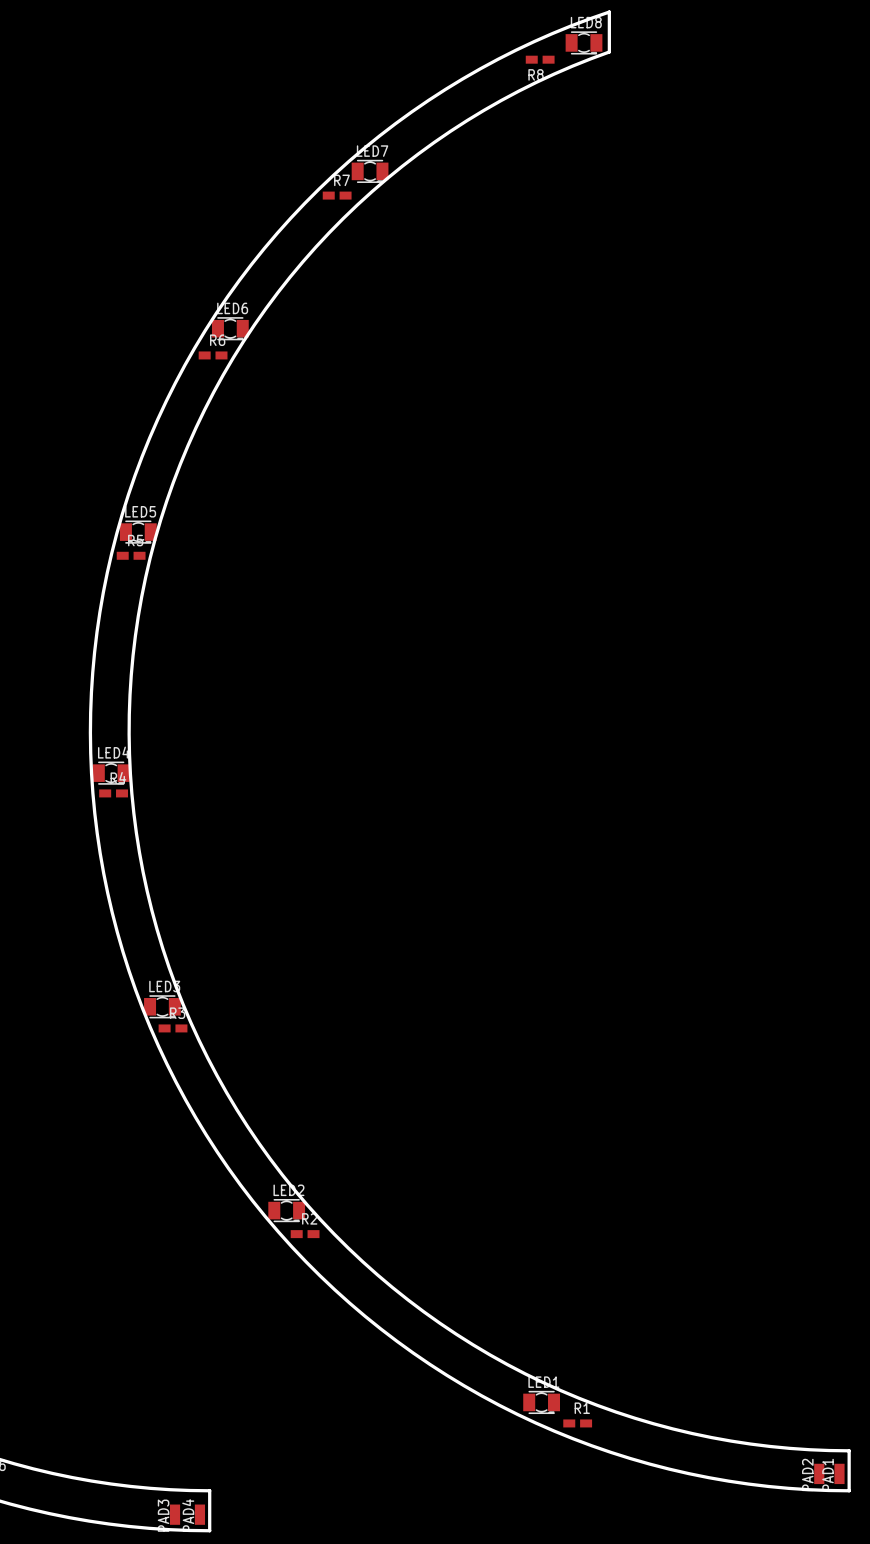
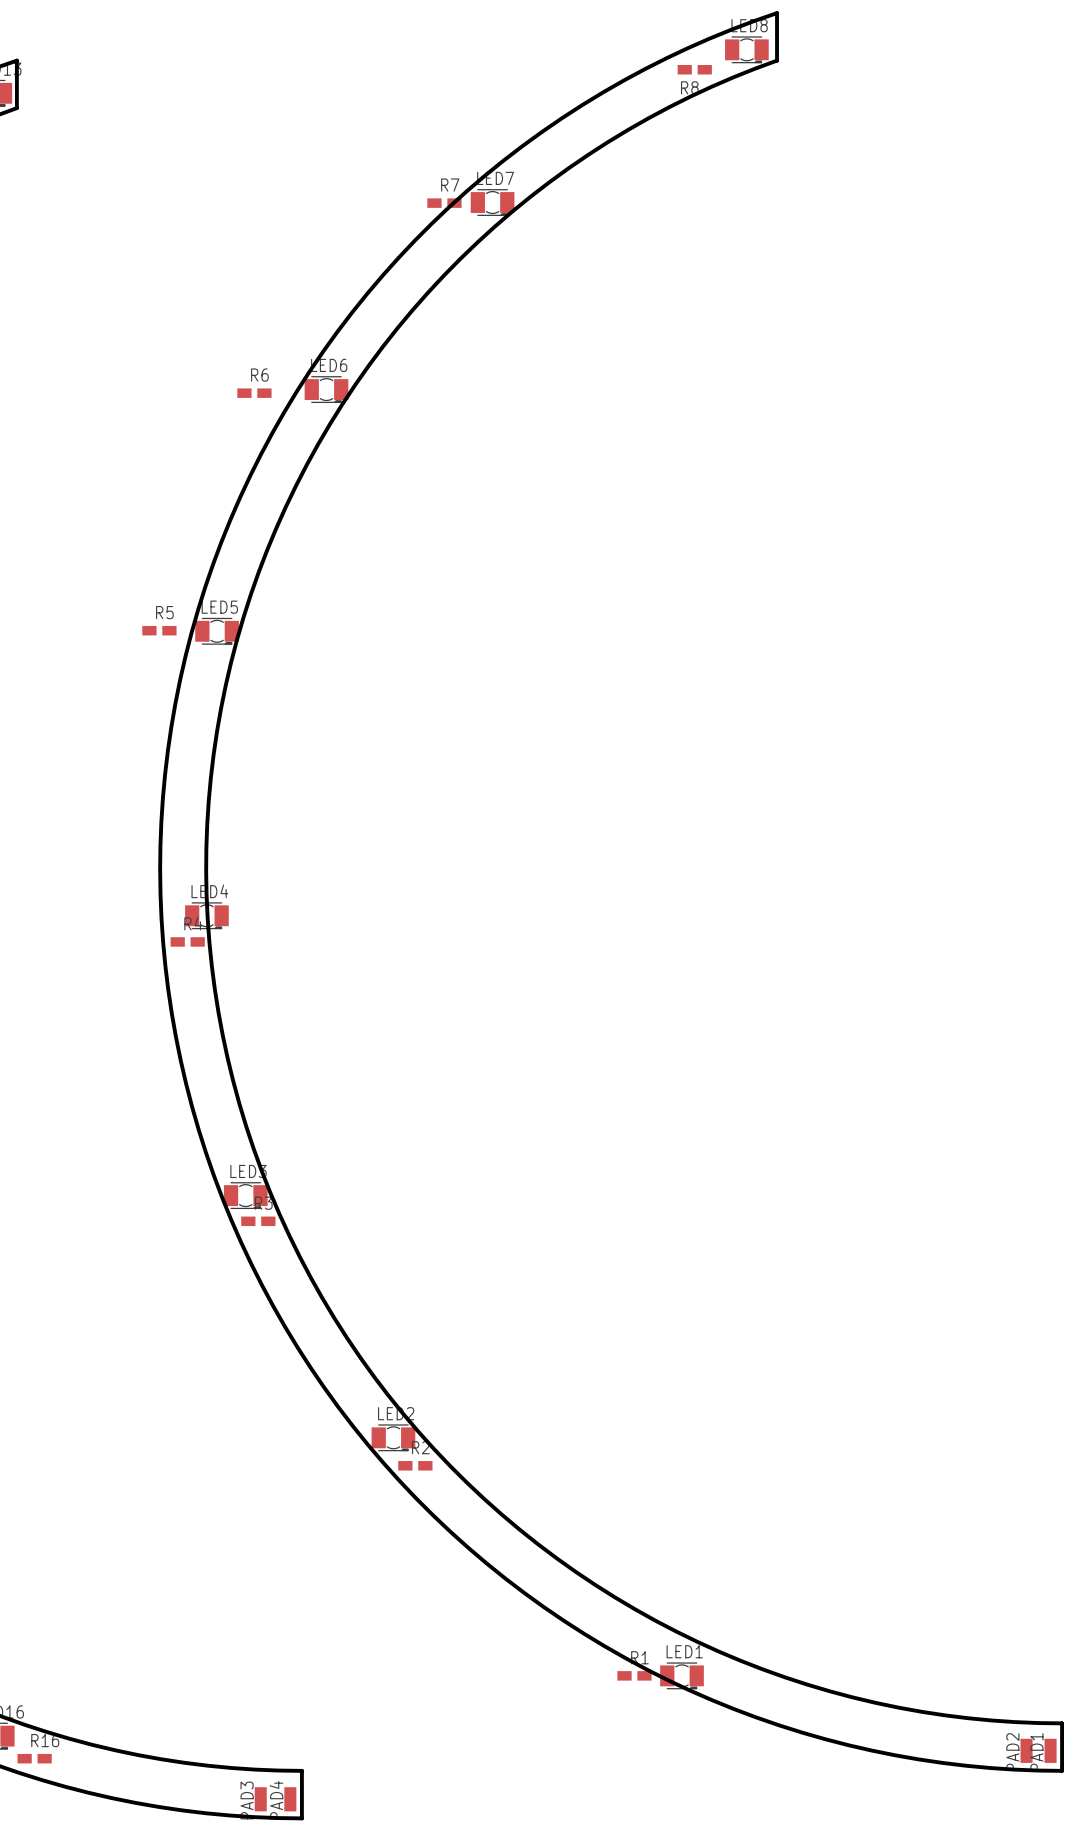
R7 position: (337, 195) -> (444, 203)
R6 position: (213, 355) -> (254, 393)
R5 position: (131, 555) -> (159, 630)
LED4 position: (111, 773) -> (206, 915)
LED1 position: (541, 1402) -> (682, 1675)
R1 position: (577, 1423) -> (634, 1675)

